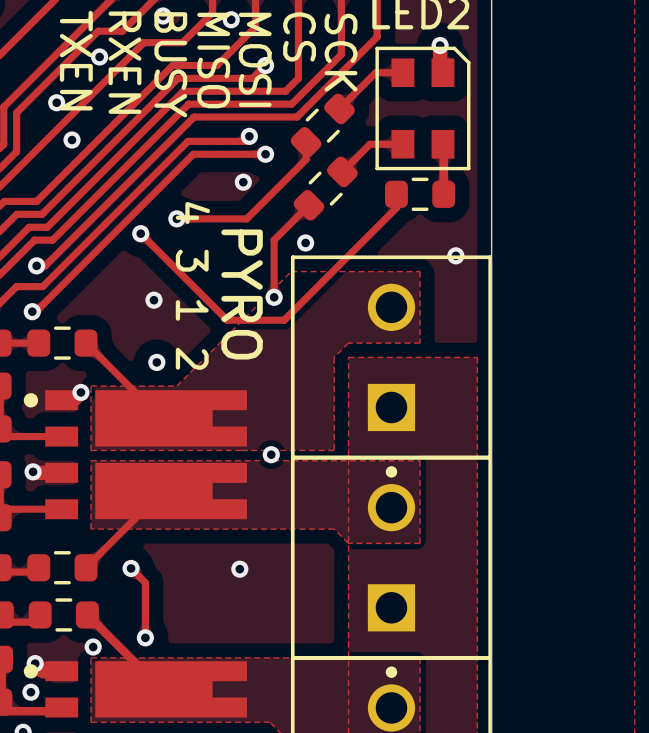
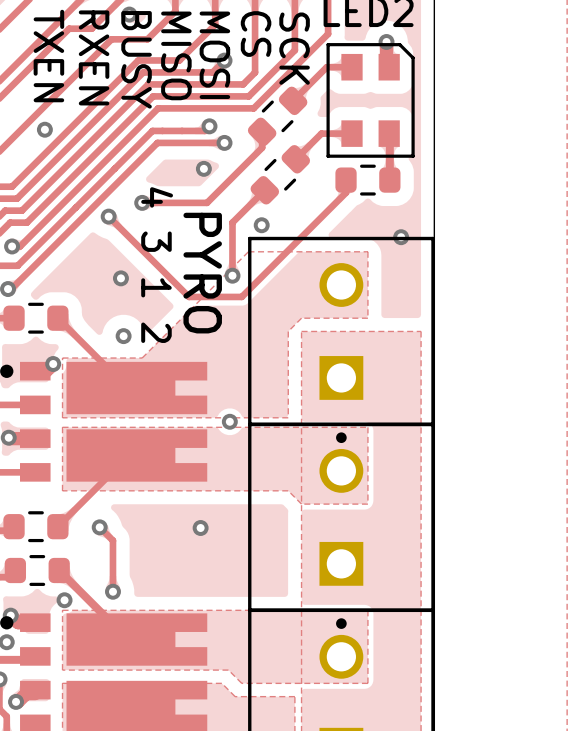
via: (231, 19) -> none
via: (99, 56) -> none
via: (56, 102) -> none

